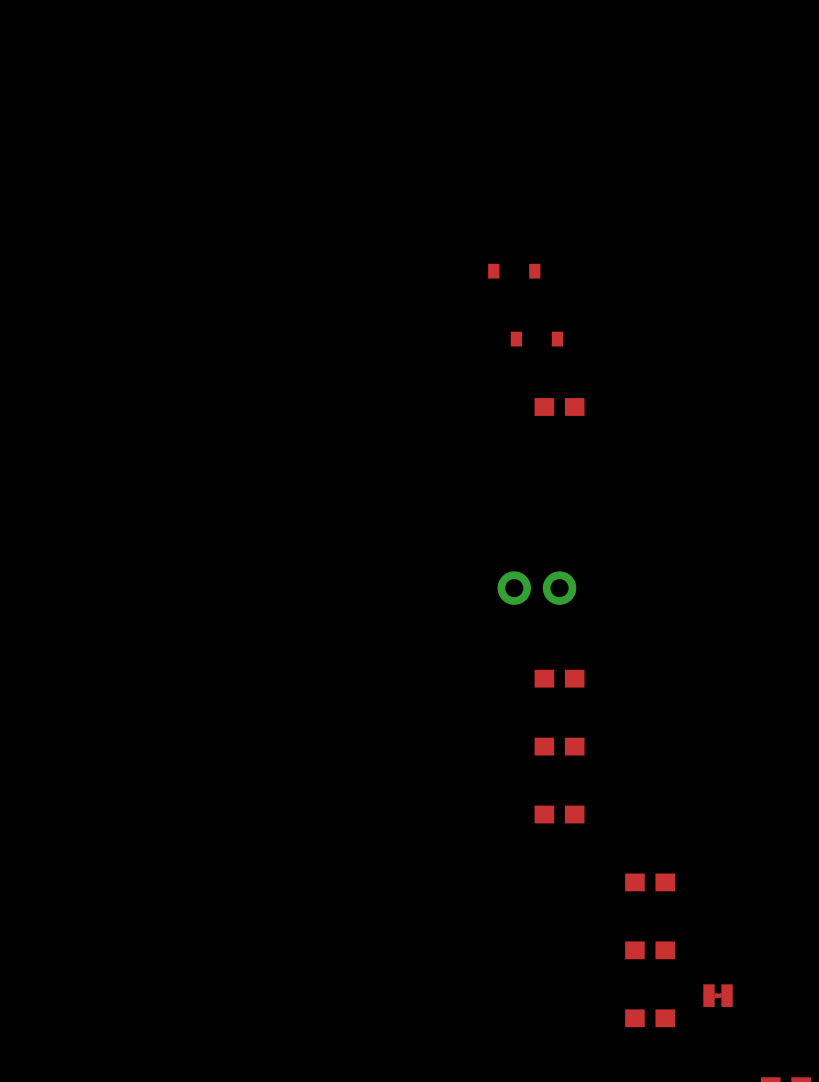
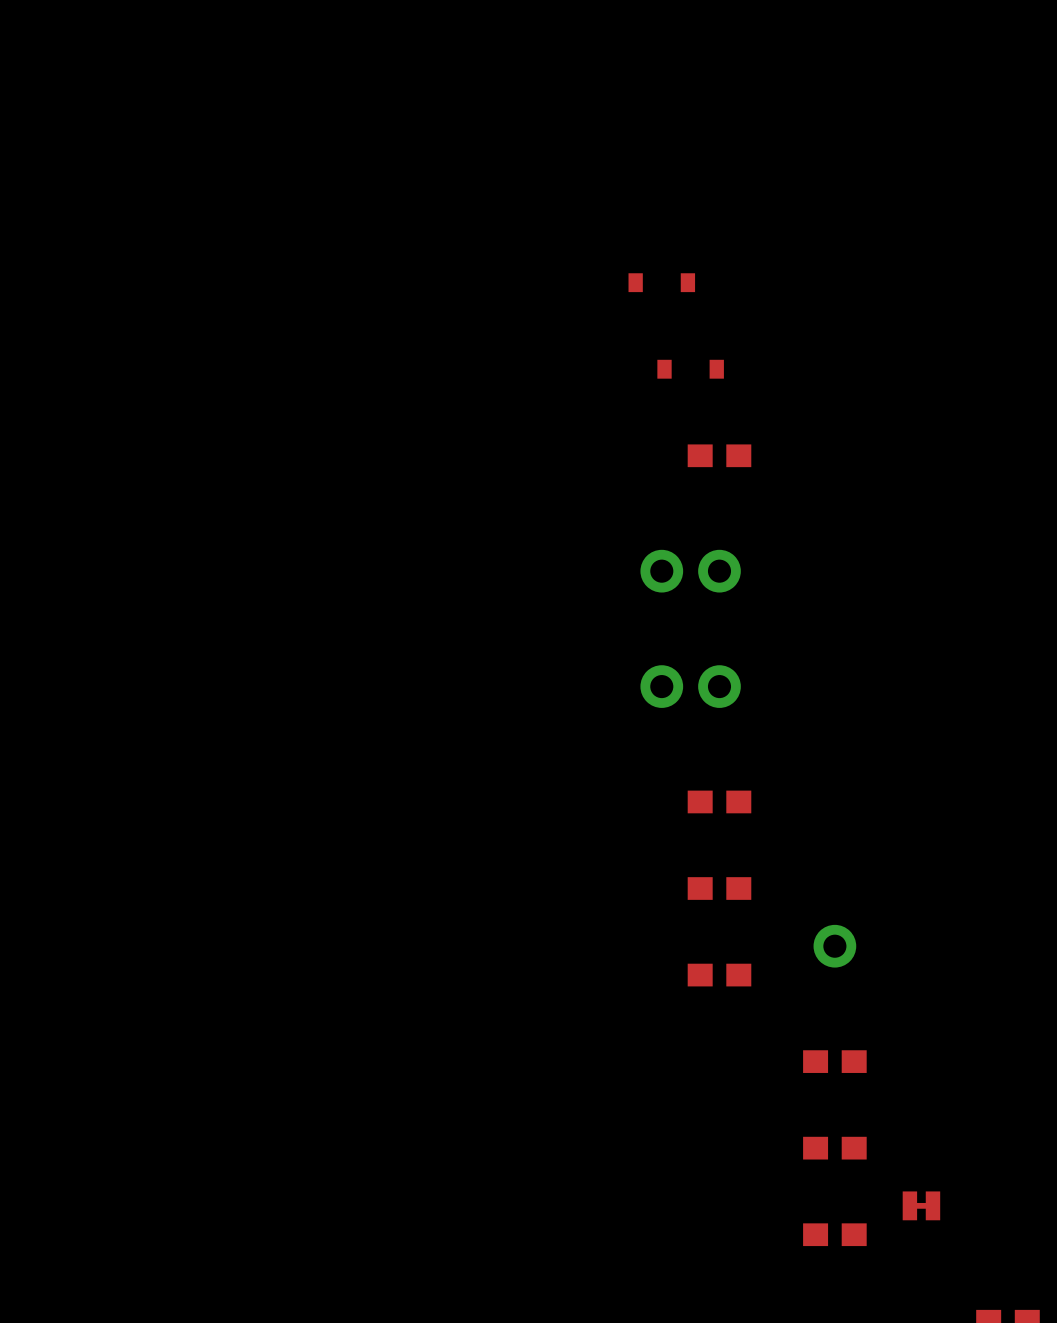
part: none -> (690, 571)
part: none -> (834, 946)

